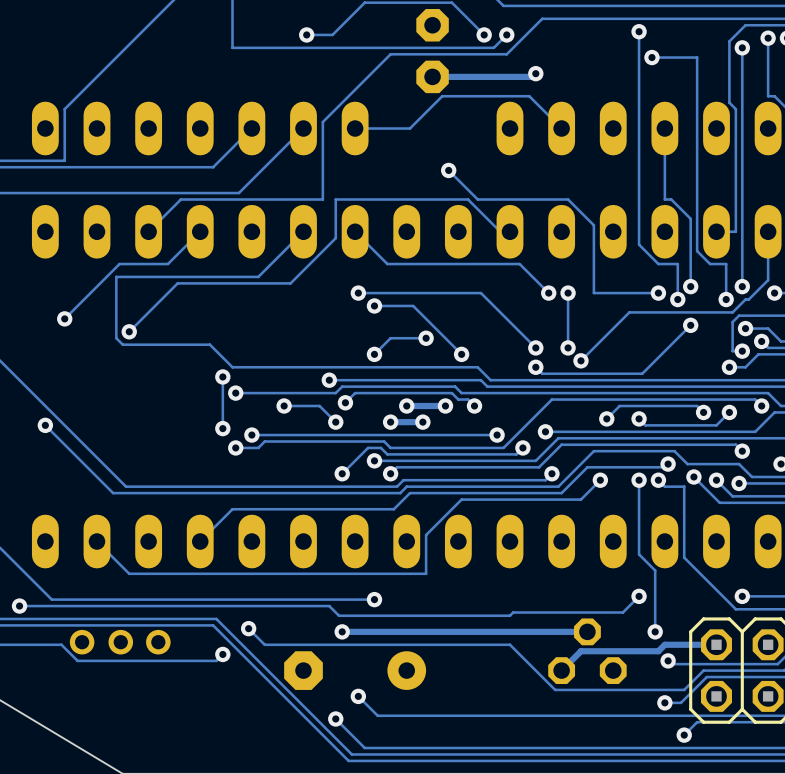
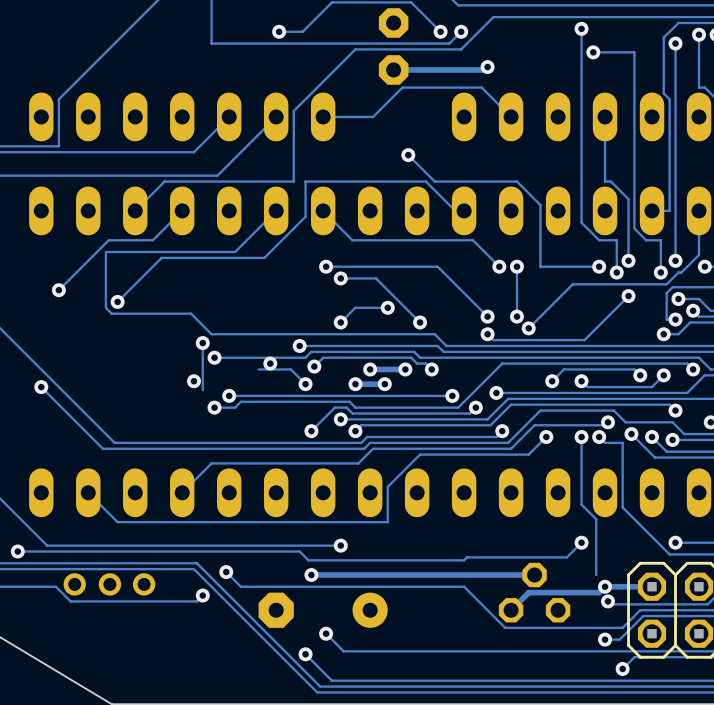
via position: (284, 406) -> (270, 363)
via position: (222, 428) -> (193, 381)
via position: (655, 631) -> (605, 586)

